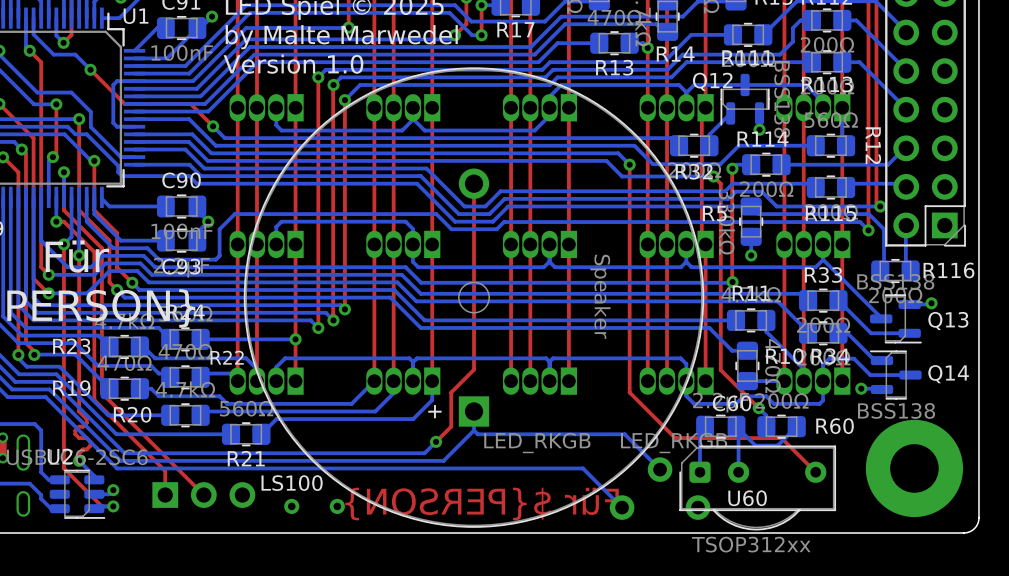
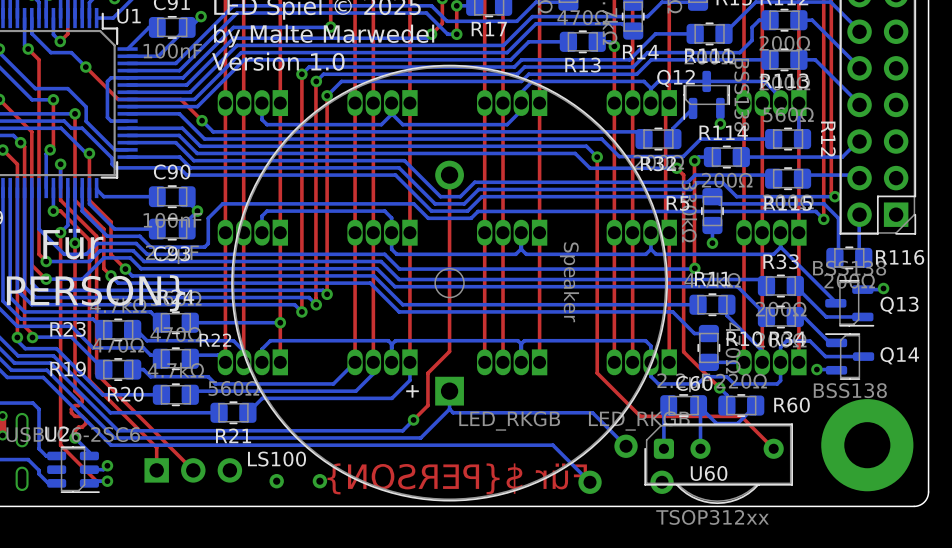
R60 value: 200Ω (781, 401) -> 220Ω (741, 381)

